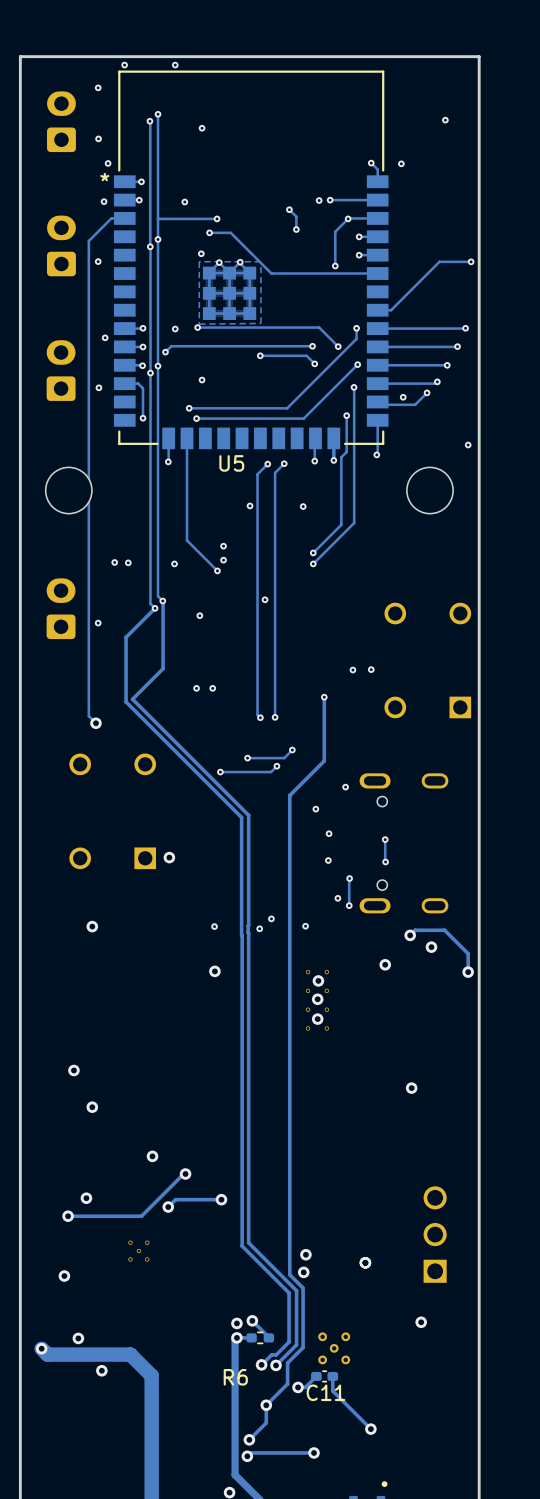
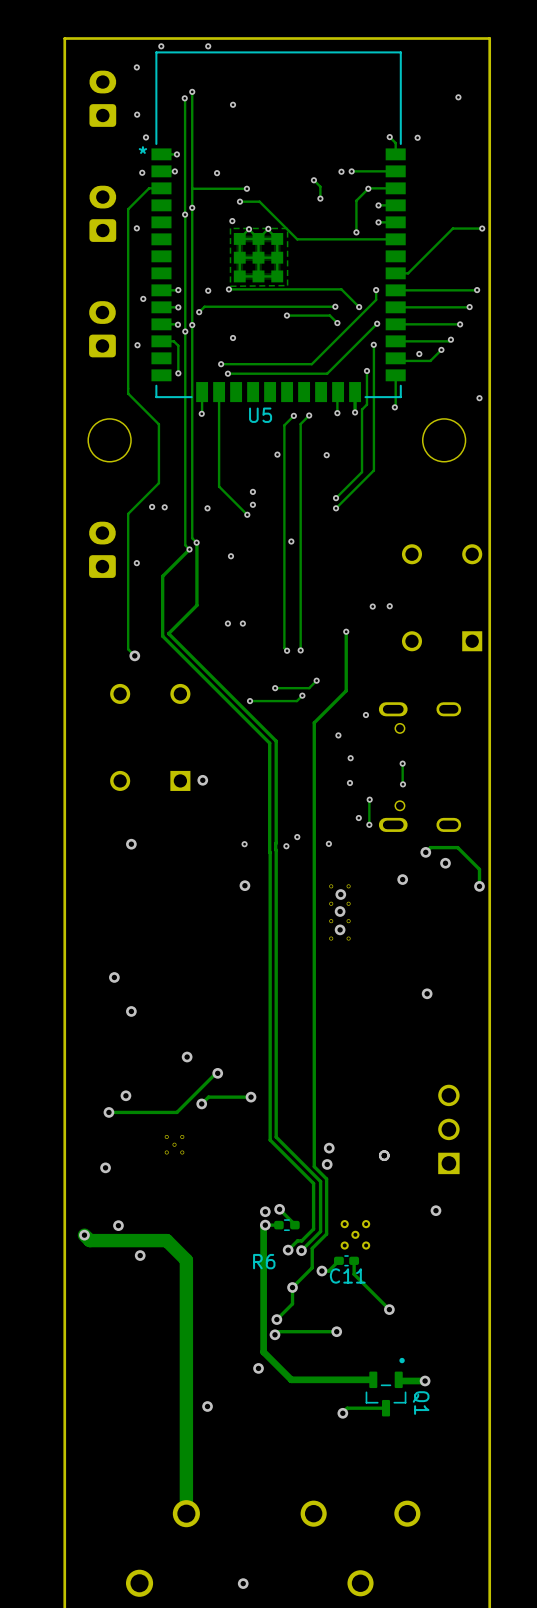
track: (88, 440) (88, 569) -> (128, 393) (158, 424) (158, 483) (128, 513)

